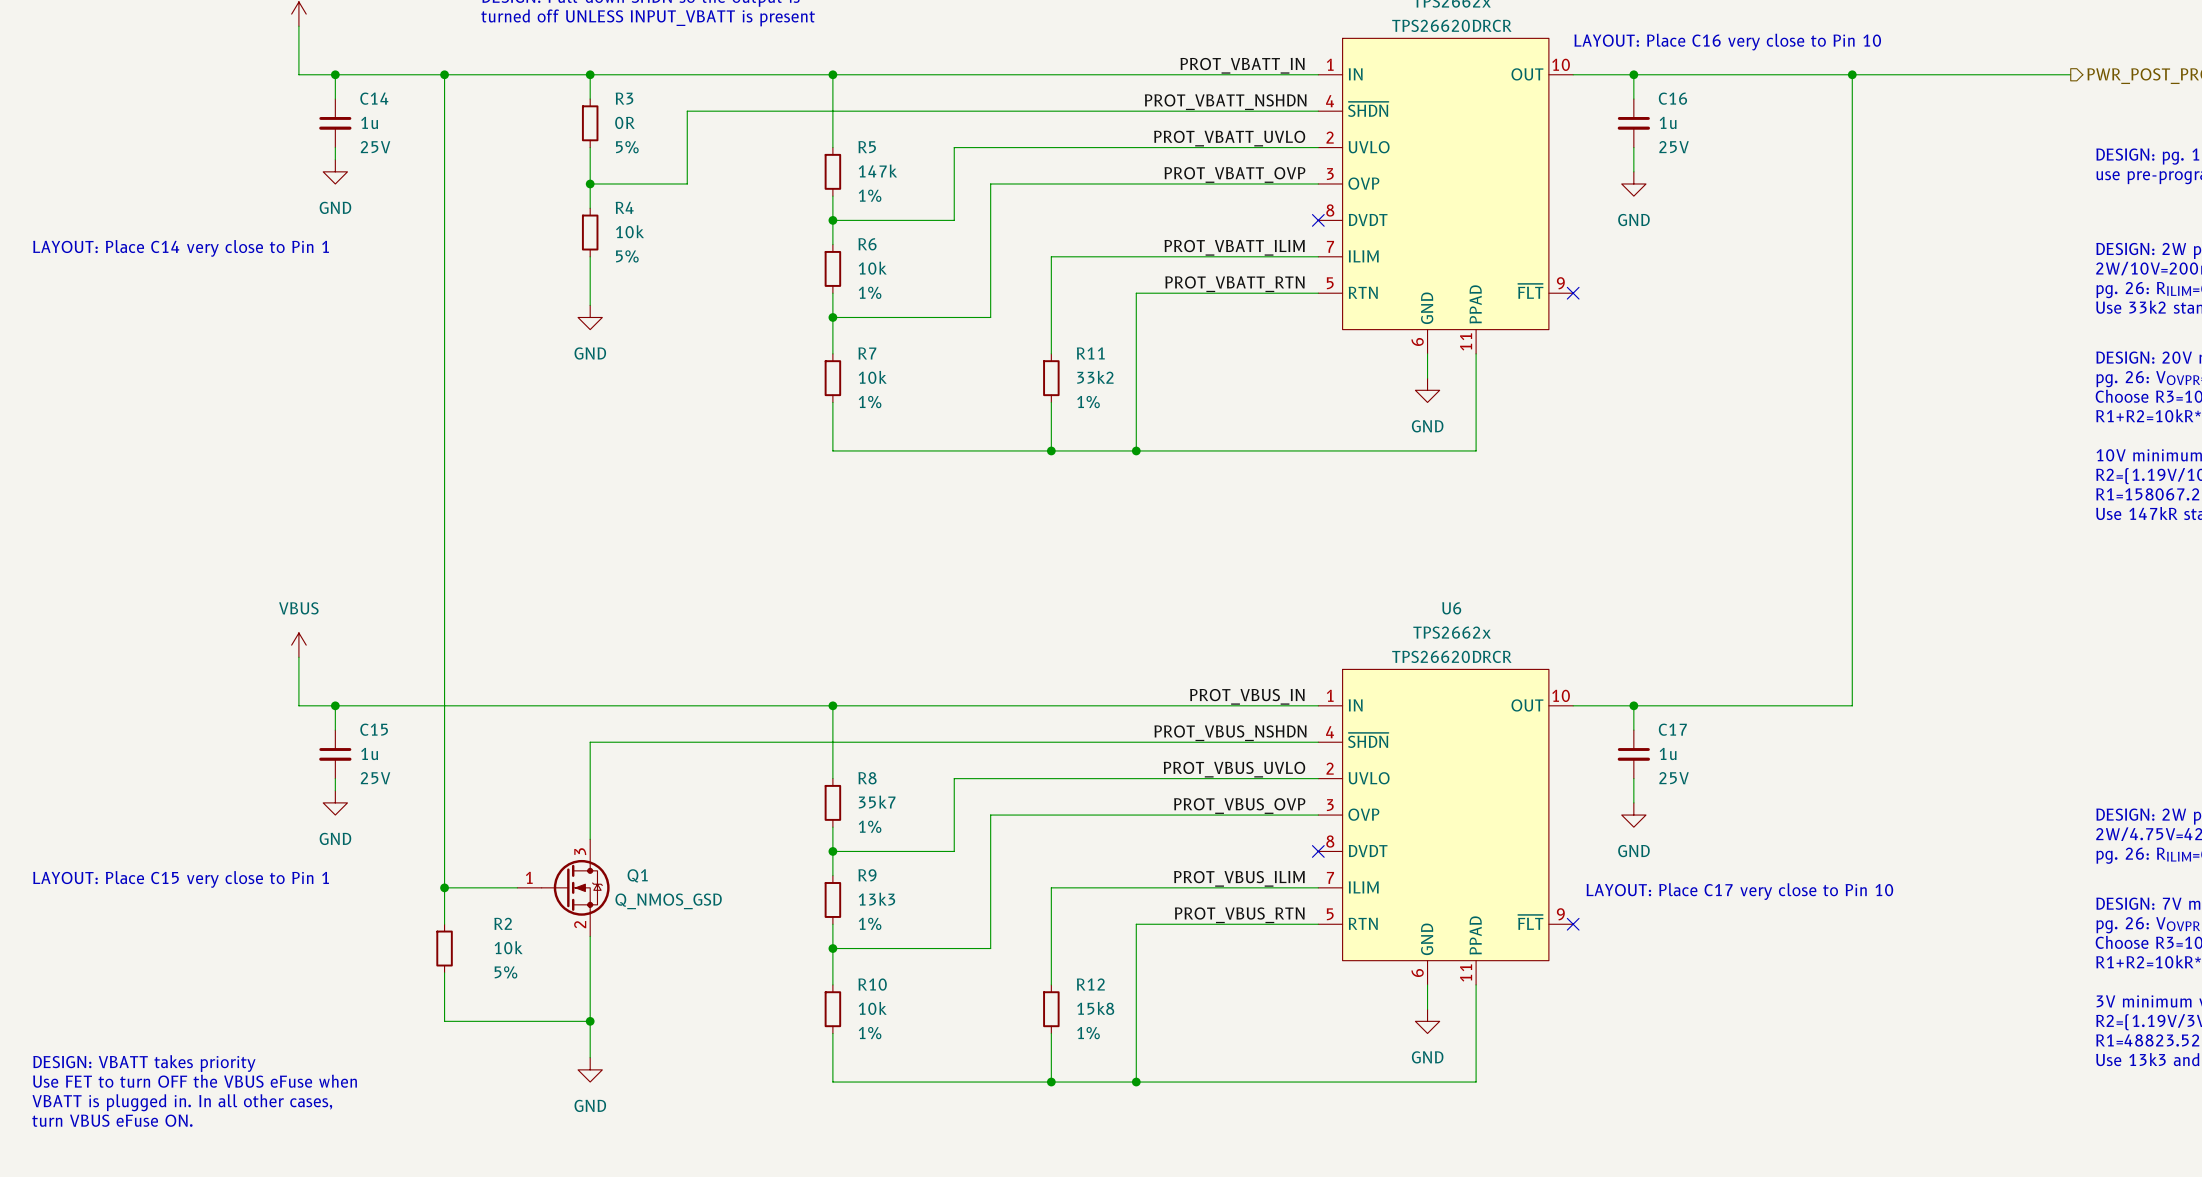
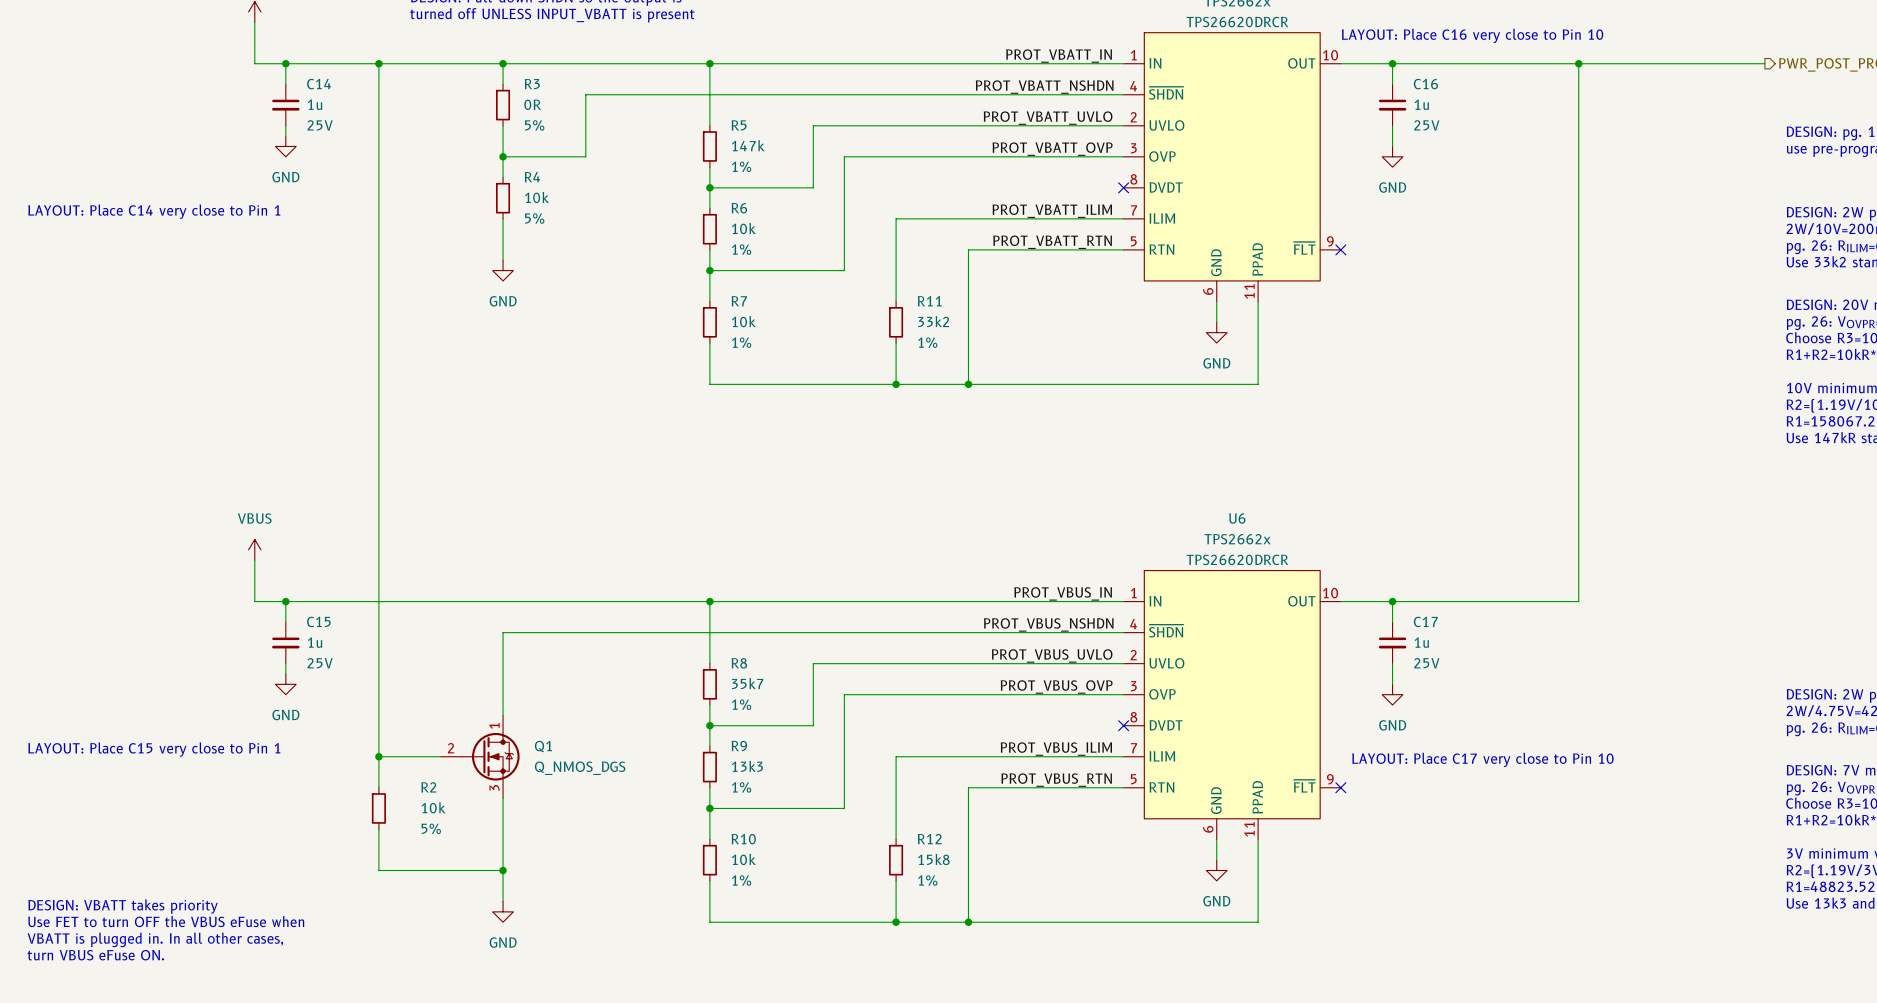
Q1 pin number: 3 (580, 851) -> 1 (494, 725)
Q1 pin number: 1 (529, 877) -> 2 (451, 748)
Q1 value: Q_NMOS_GSD (668, 901) -> Q_NMOS_DGS (580, 768)
Q1 pin number: 2 (580, 924) -> 3 (494, 787)

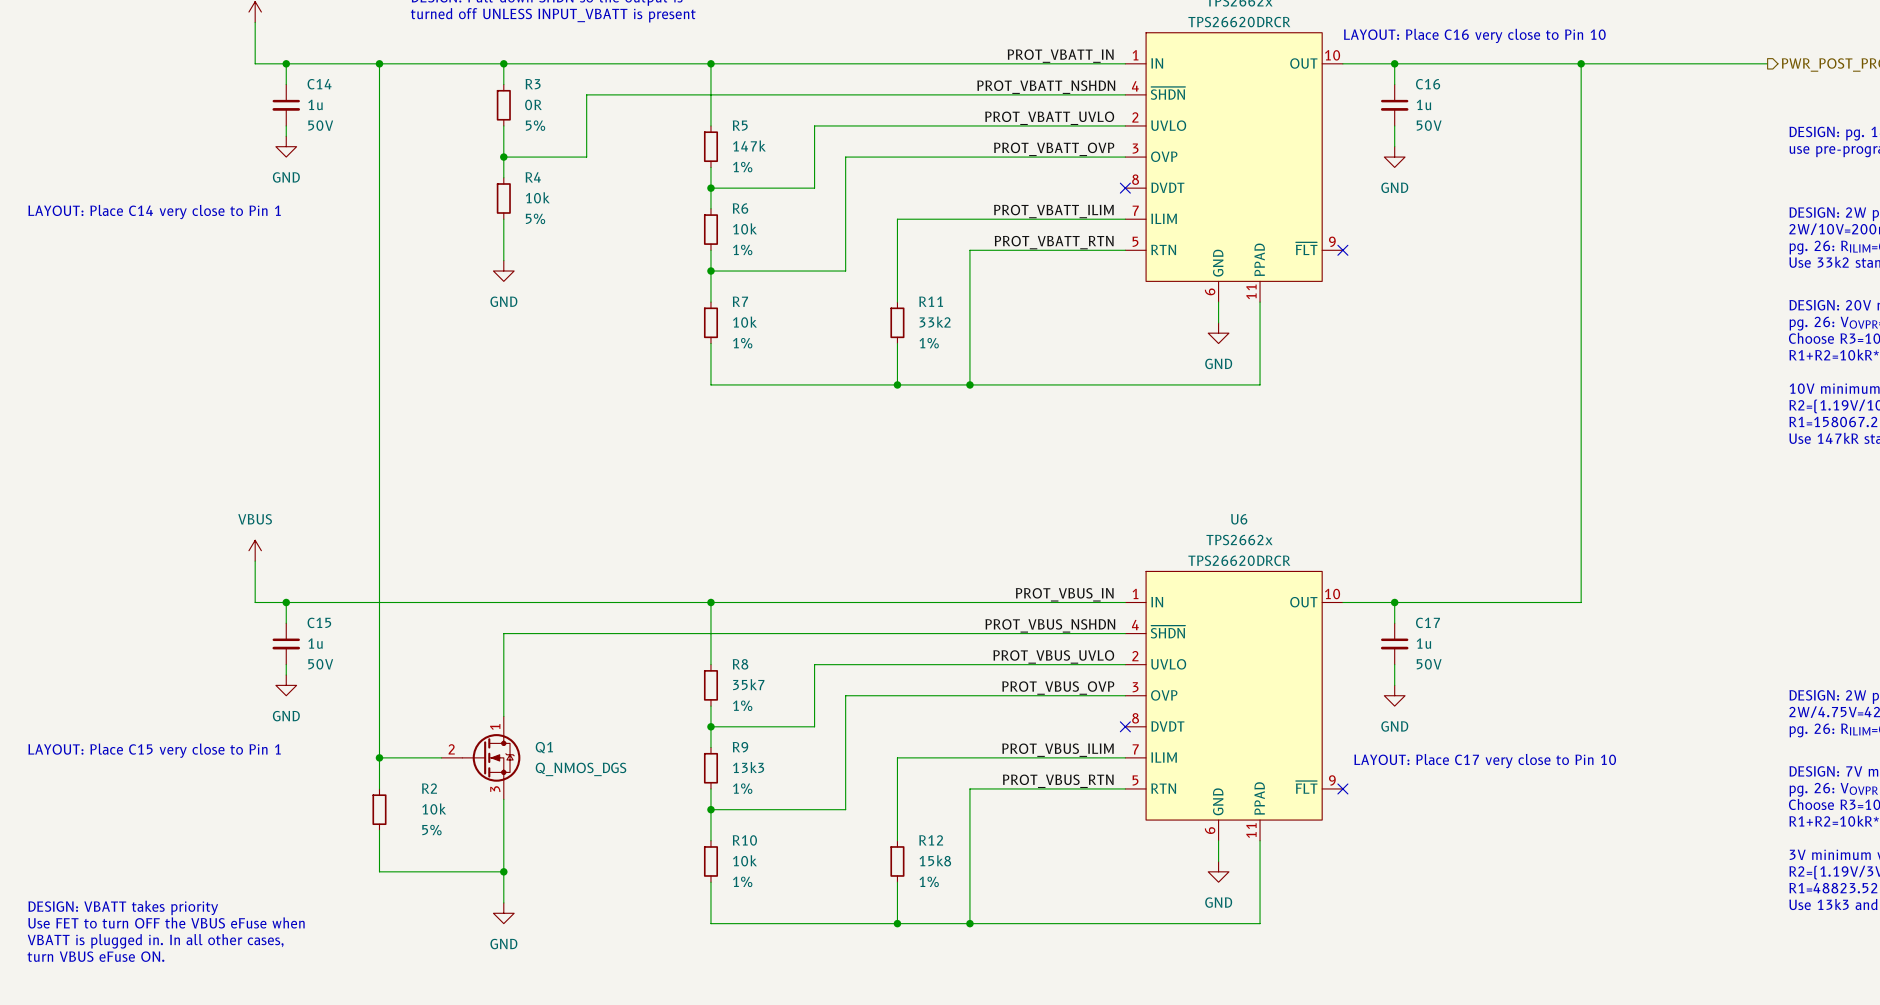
C14 text: 25V (320, 125) -> 50V (320, 125)
C16 text: 25V (1426, 125) -> 50V (1429, 125)
C15 text: 25V (320, 663) -> 50V (320, 664)
C17 text: 25V (1426, 663) -> 50V (1429, 664)

